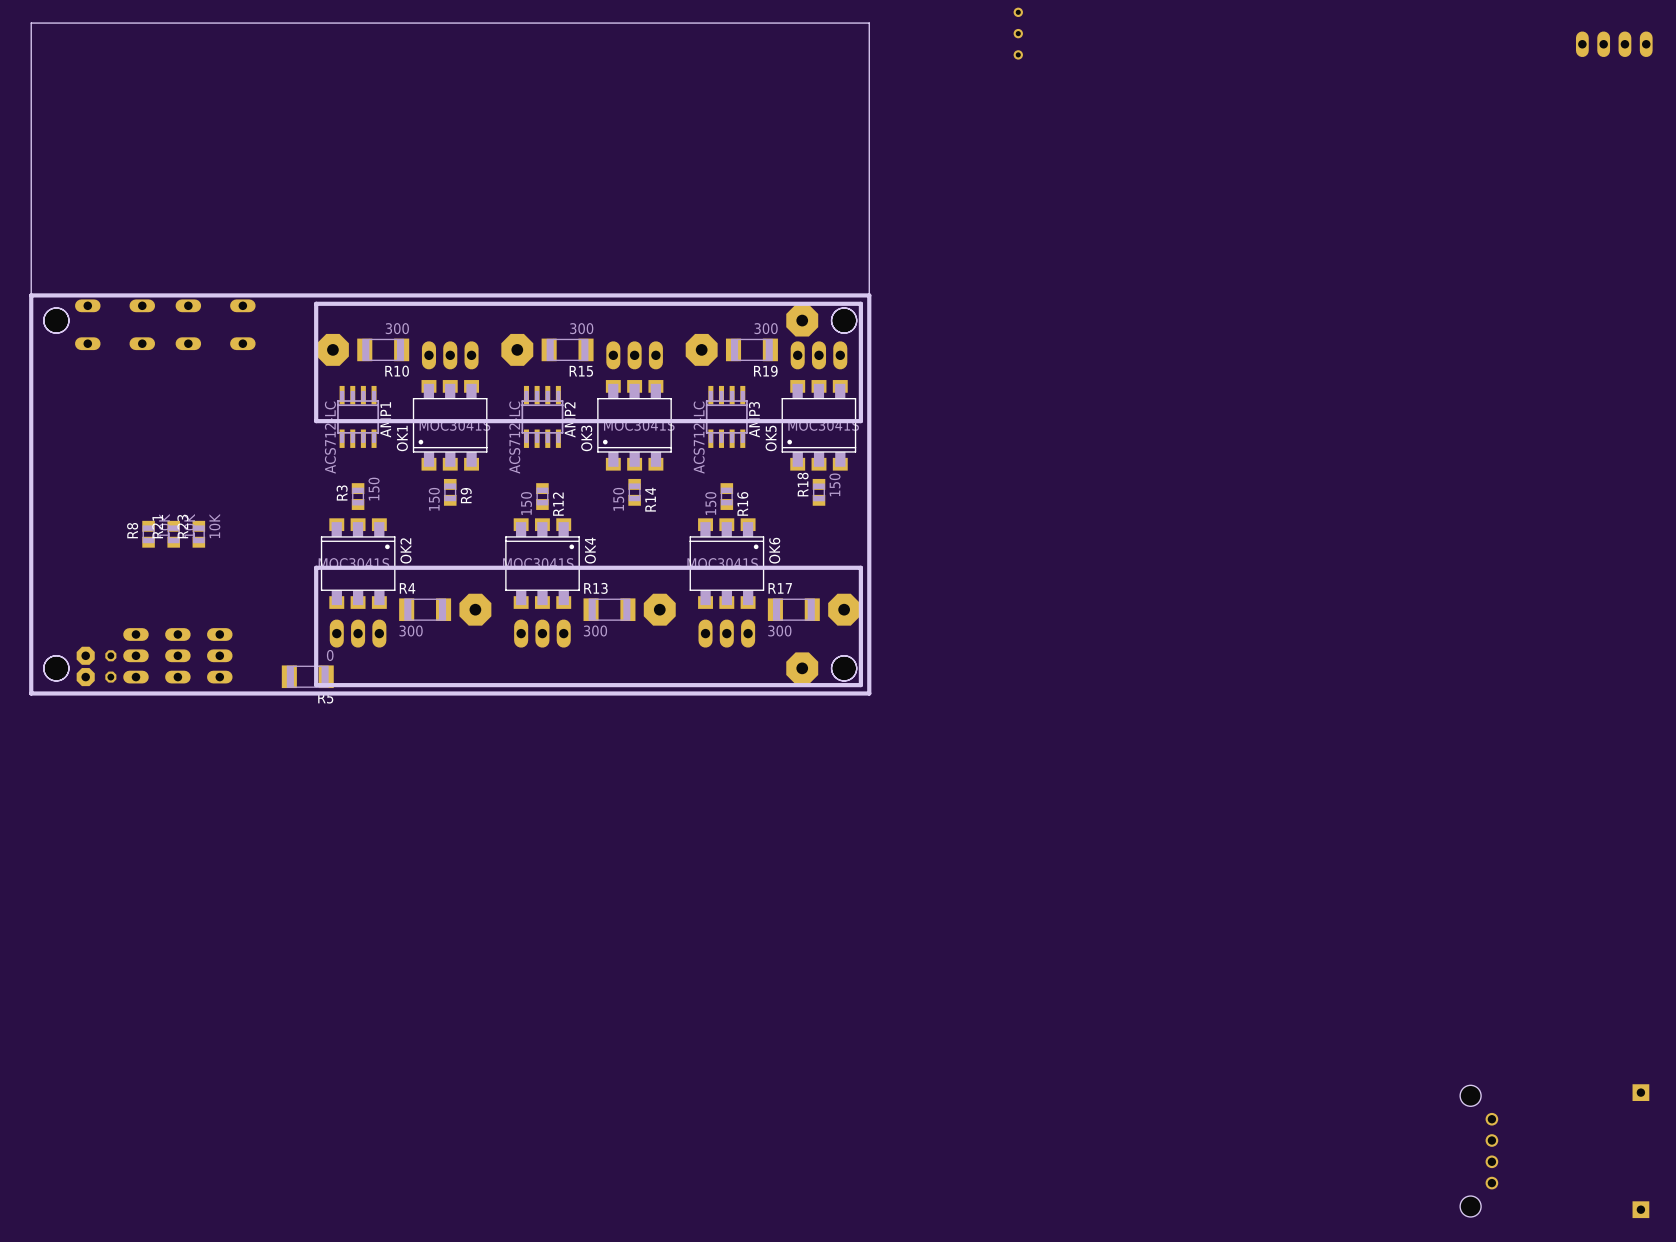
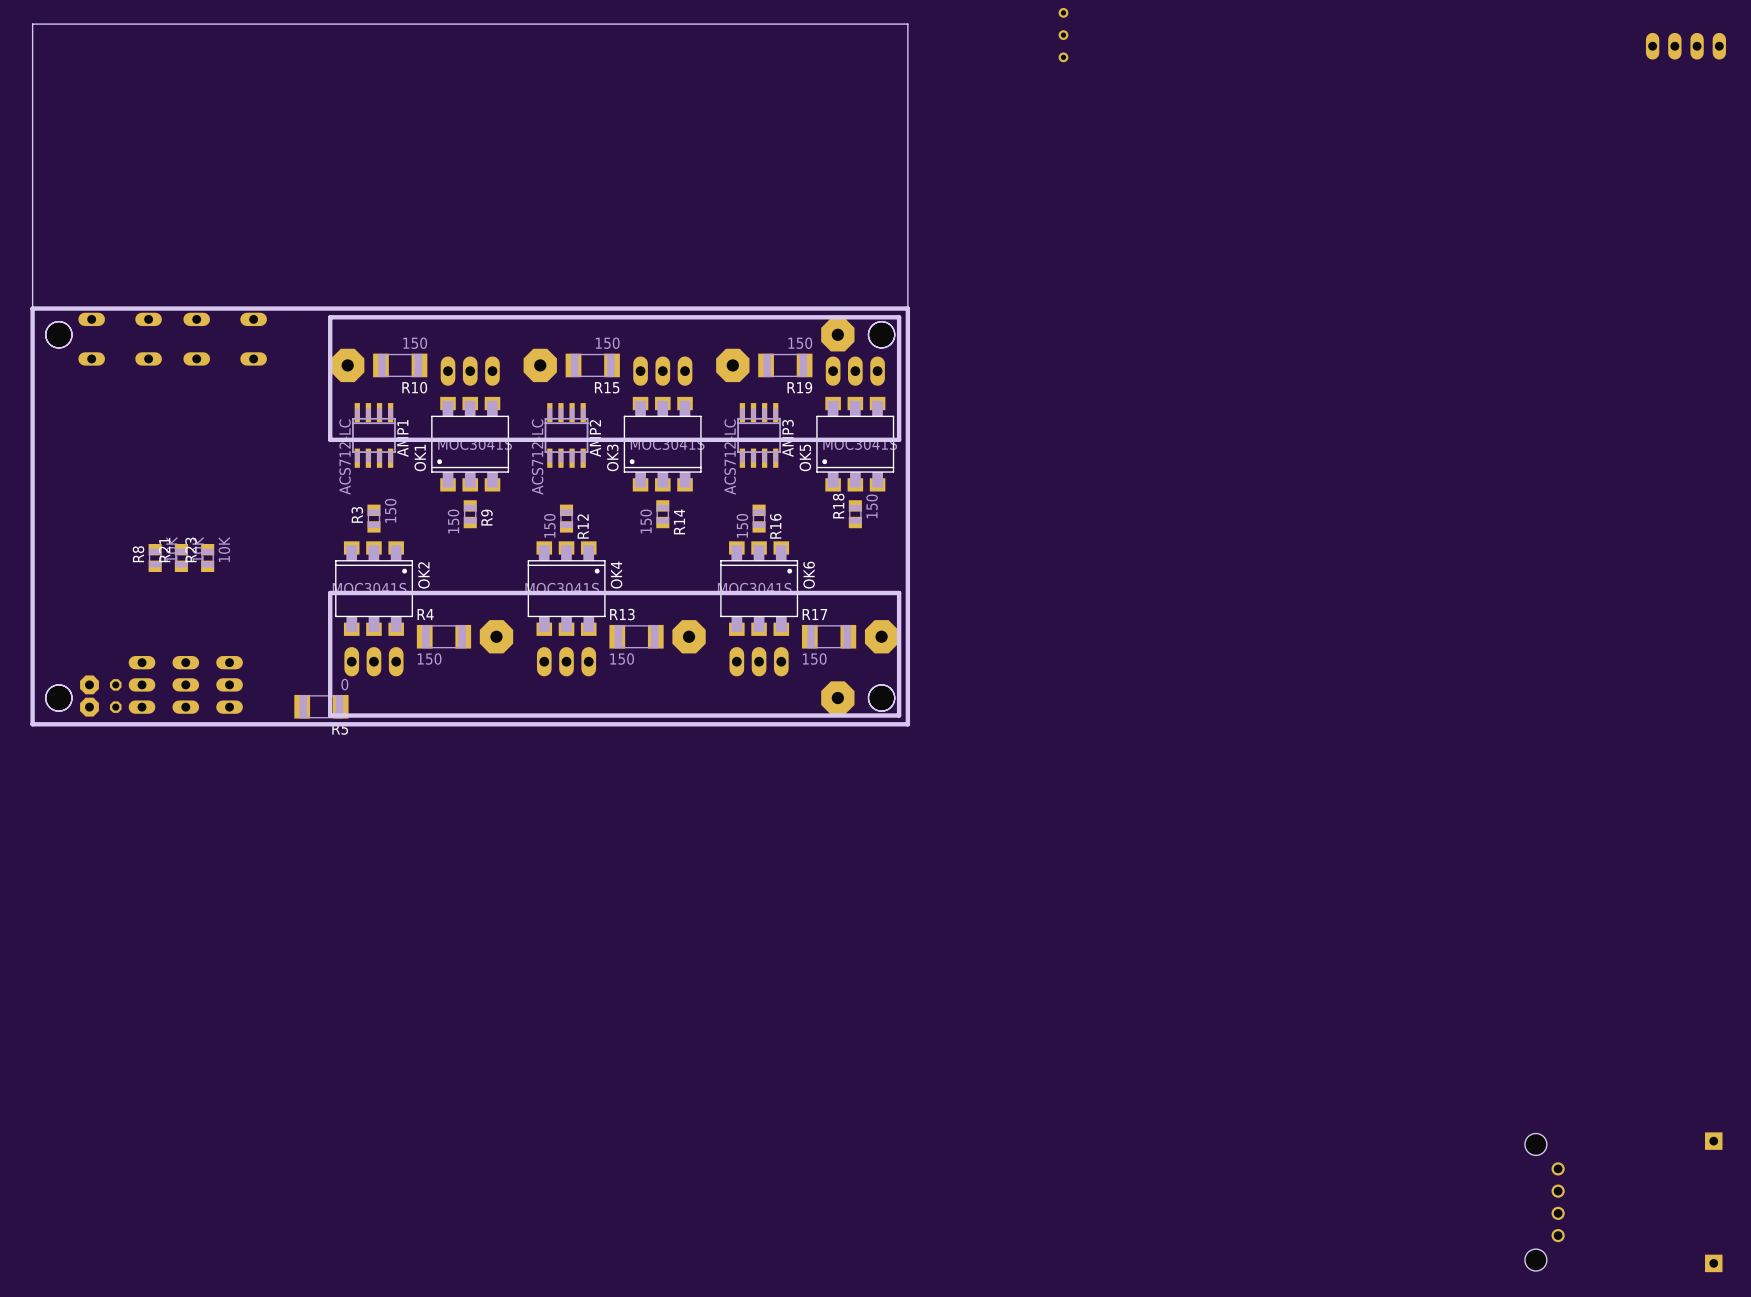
R10 value: 300 (397, 328) -> 150 (415, 343)
R15 value: 300 (581, 328) -> 150 (607, 343)
R19 value: 300 (766, 328) -> 150 (800, 343)
R4 value: 300 (411, 630) -> 150 (429, 658)
R13 value: 300 (595, 630) -> 150 (622, 658)
R17 value: 300 (779, 630) -> 150 (814, 658)

